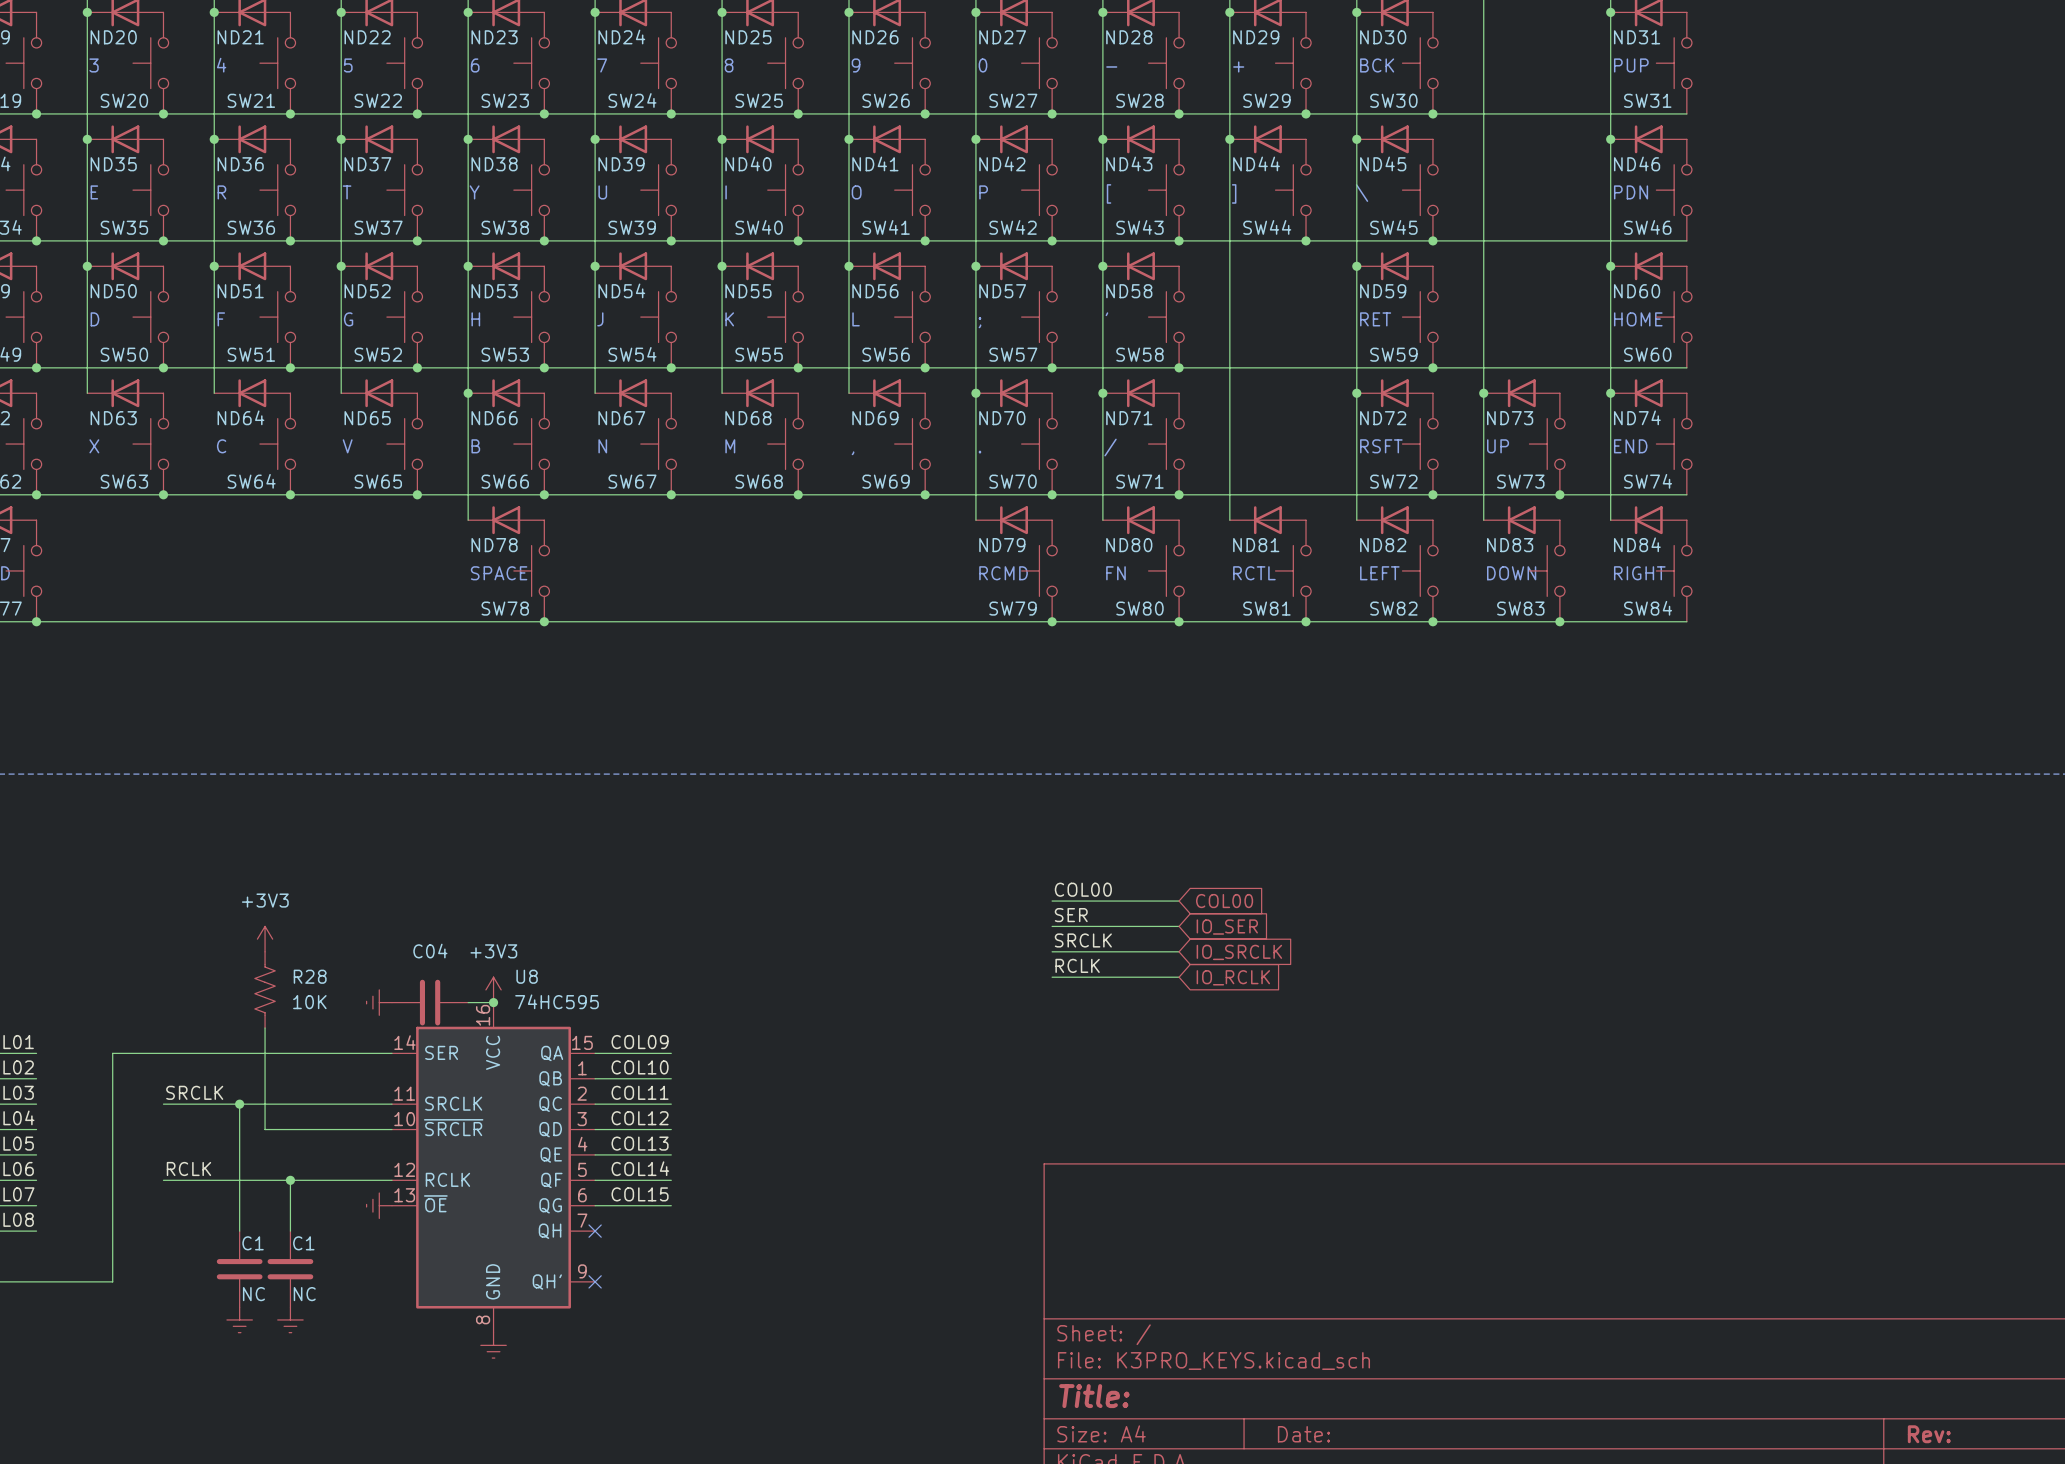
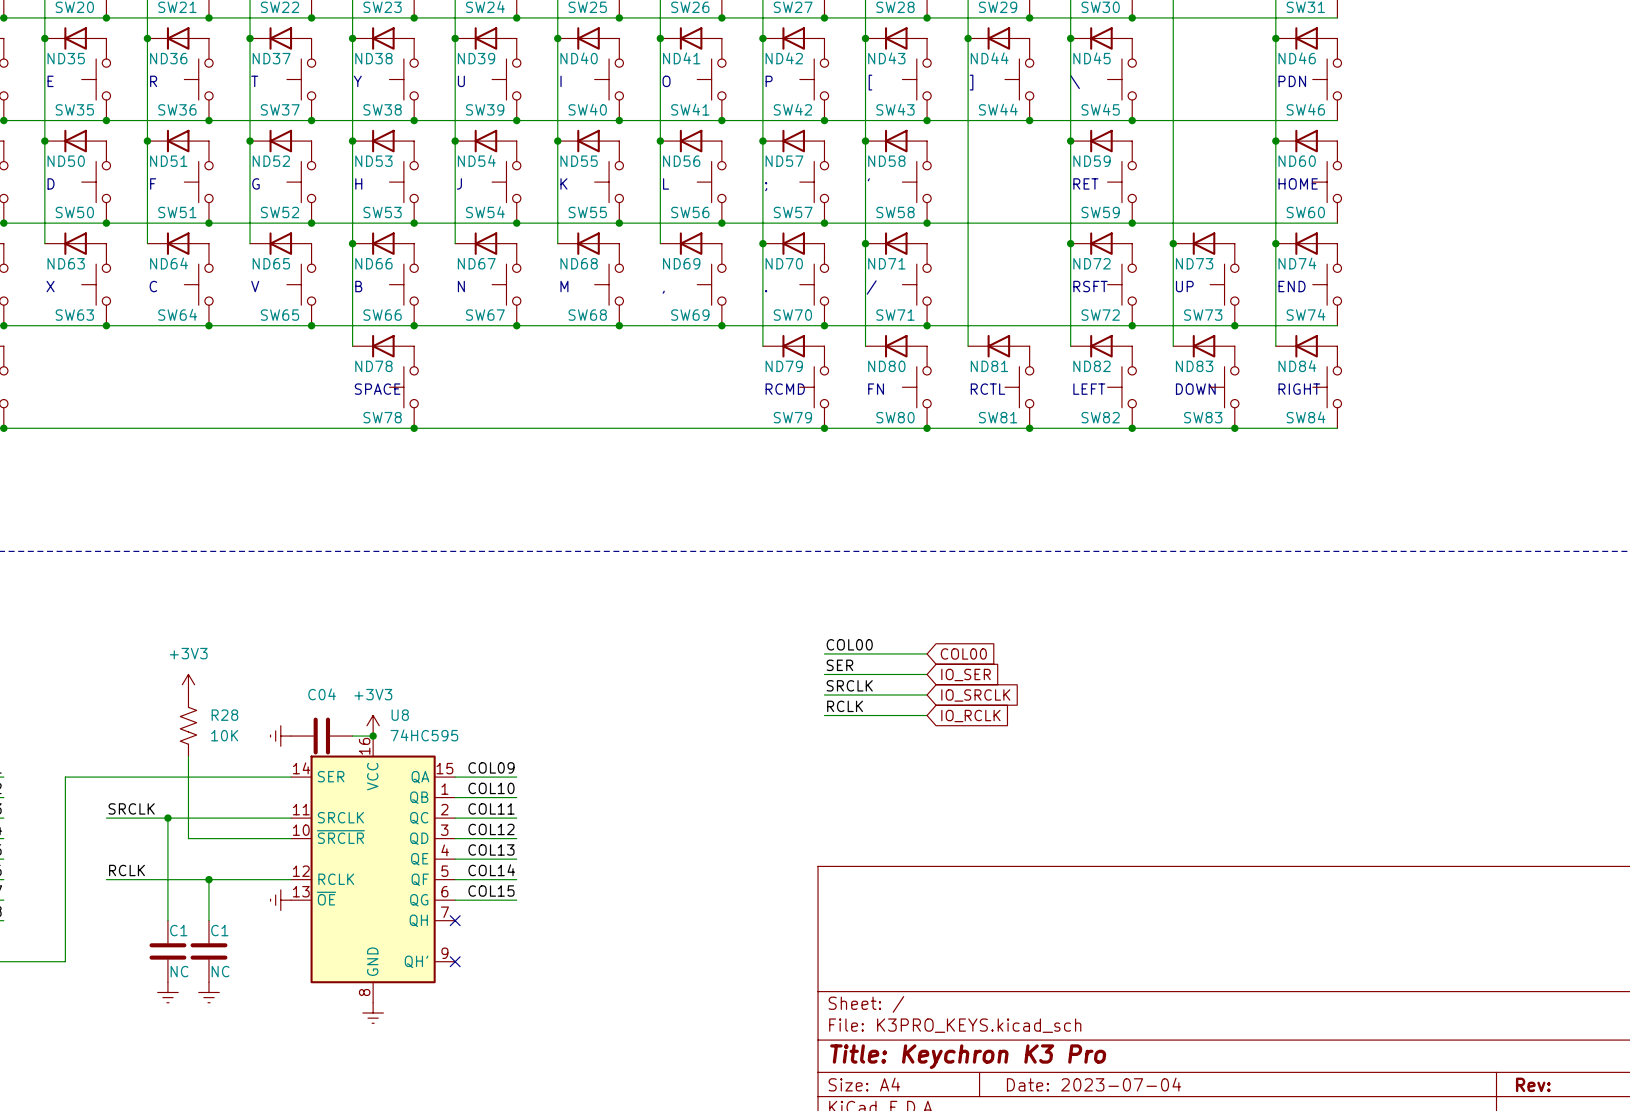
title block: Title: (1094, 1396) -> Title: Keychron K3 Pro (968, 1056)
title block: Date: (1303, 1434) -> Date: 2023-07-04 (1094, 1084)

